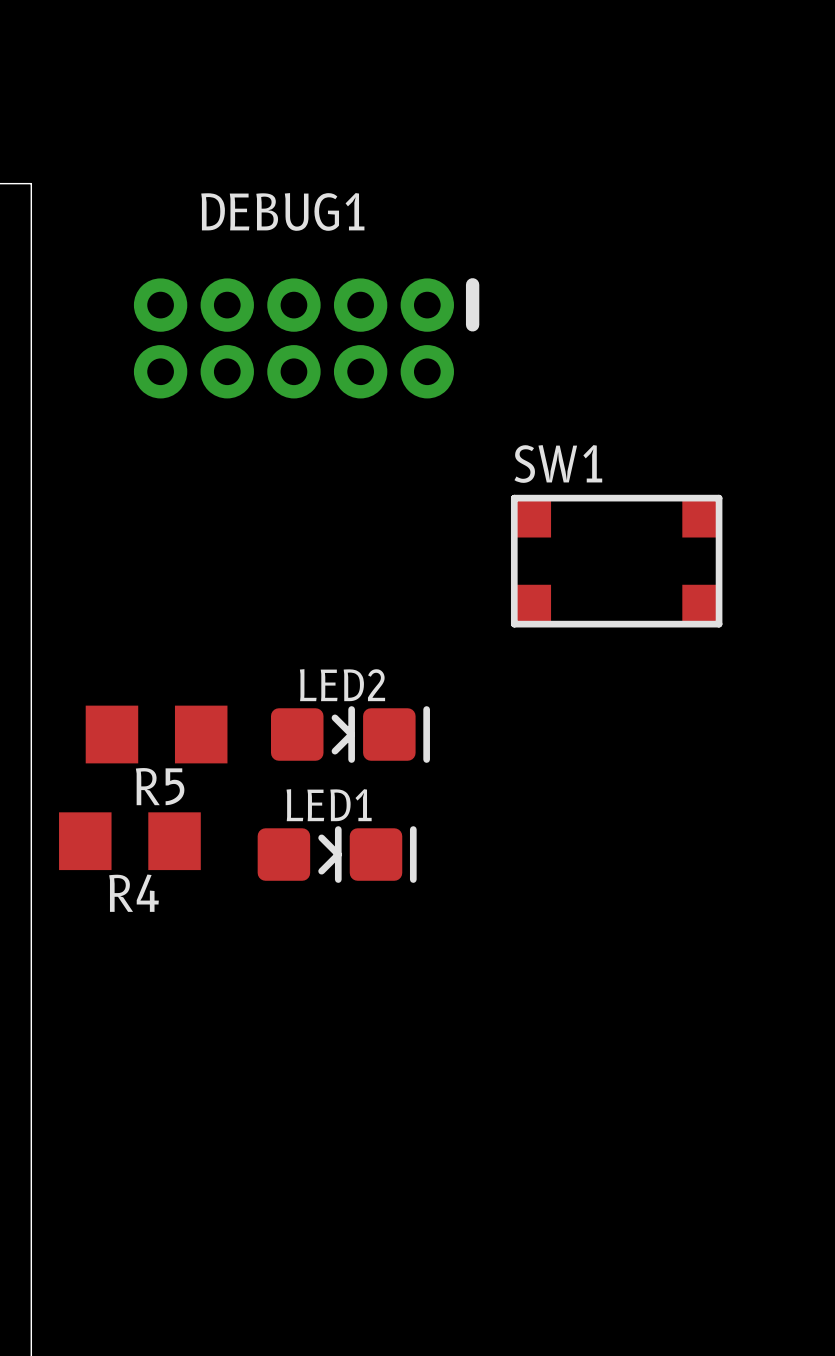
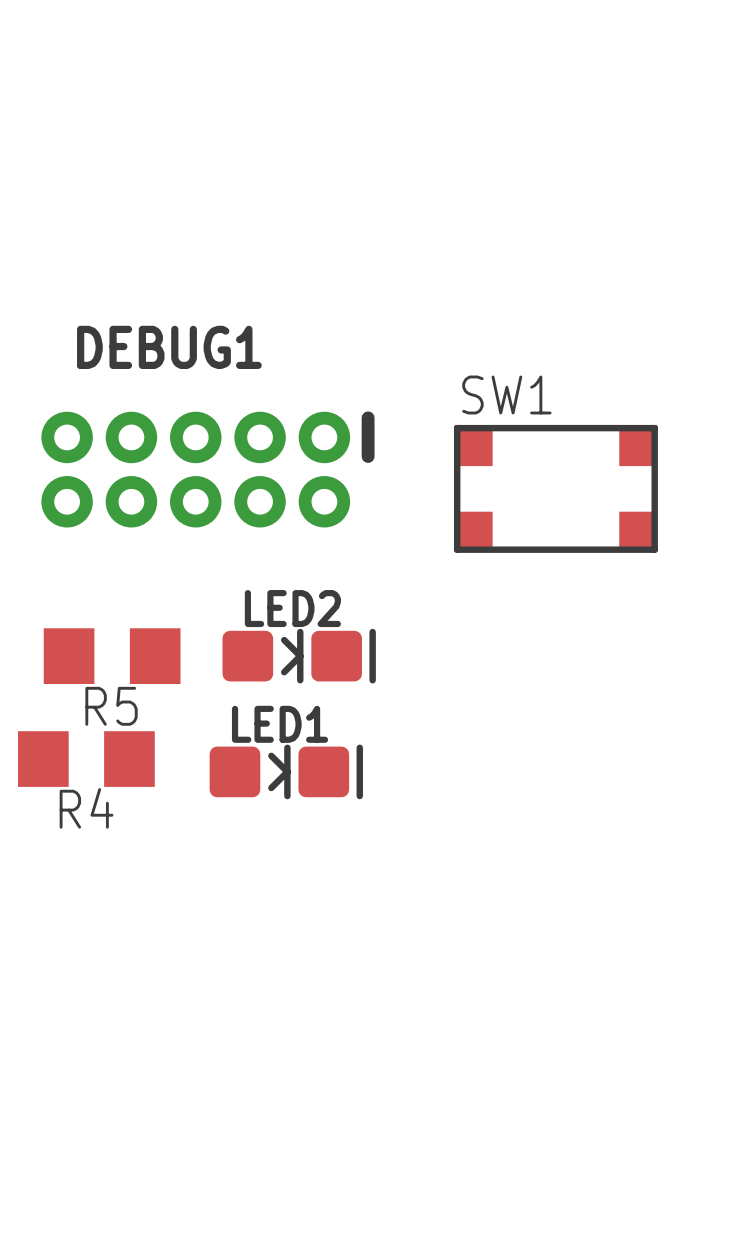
DEBUG1 position: (306, 338) -> (207, 469)

